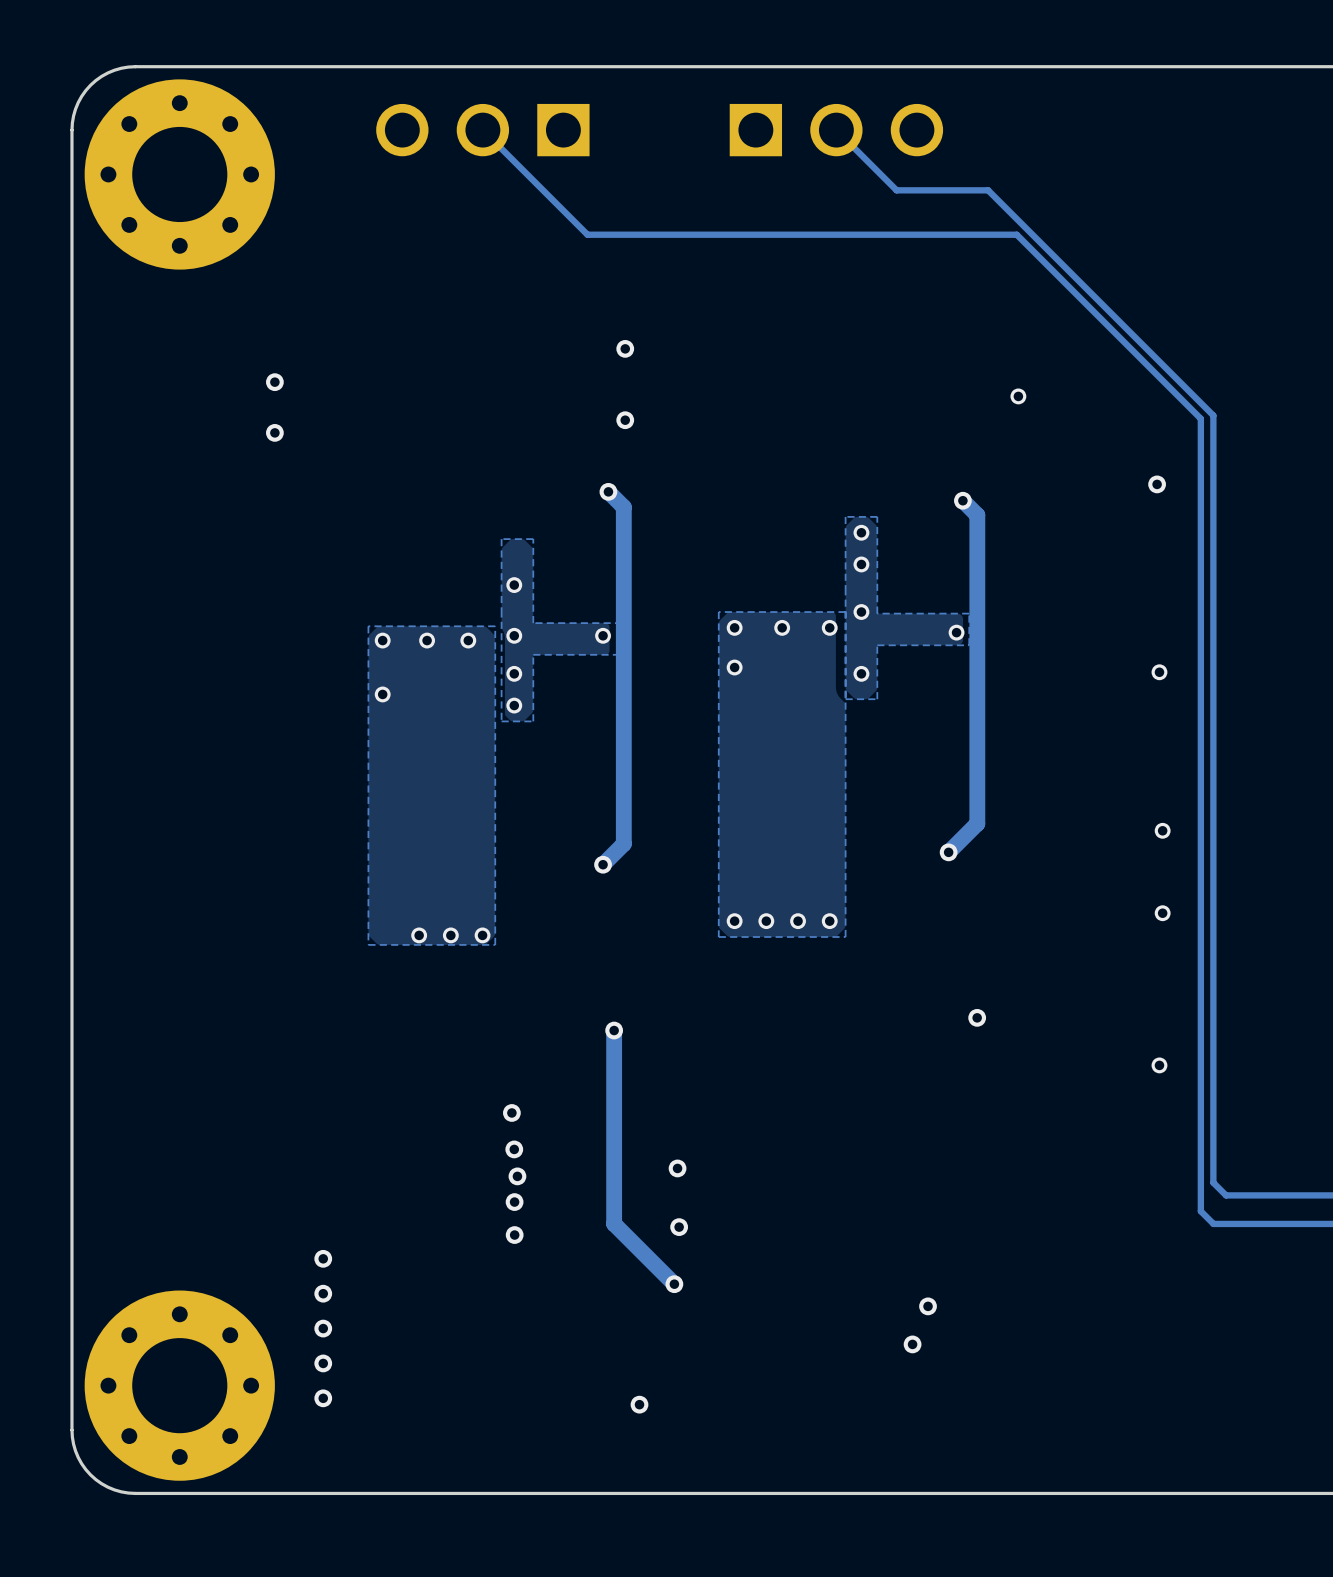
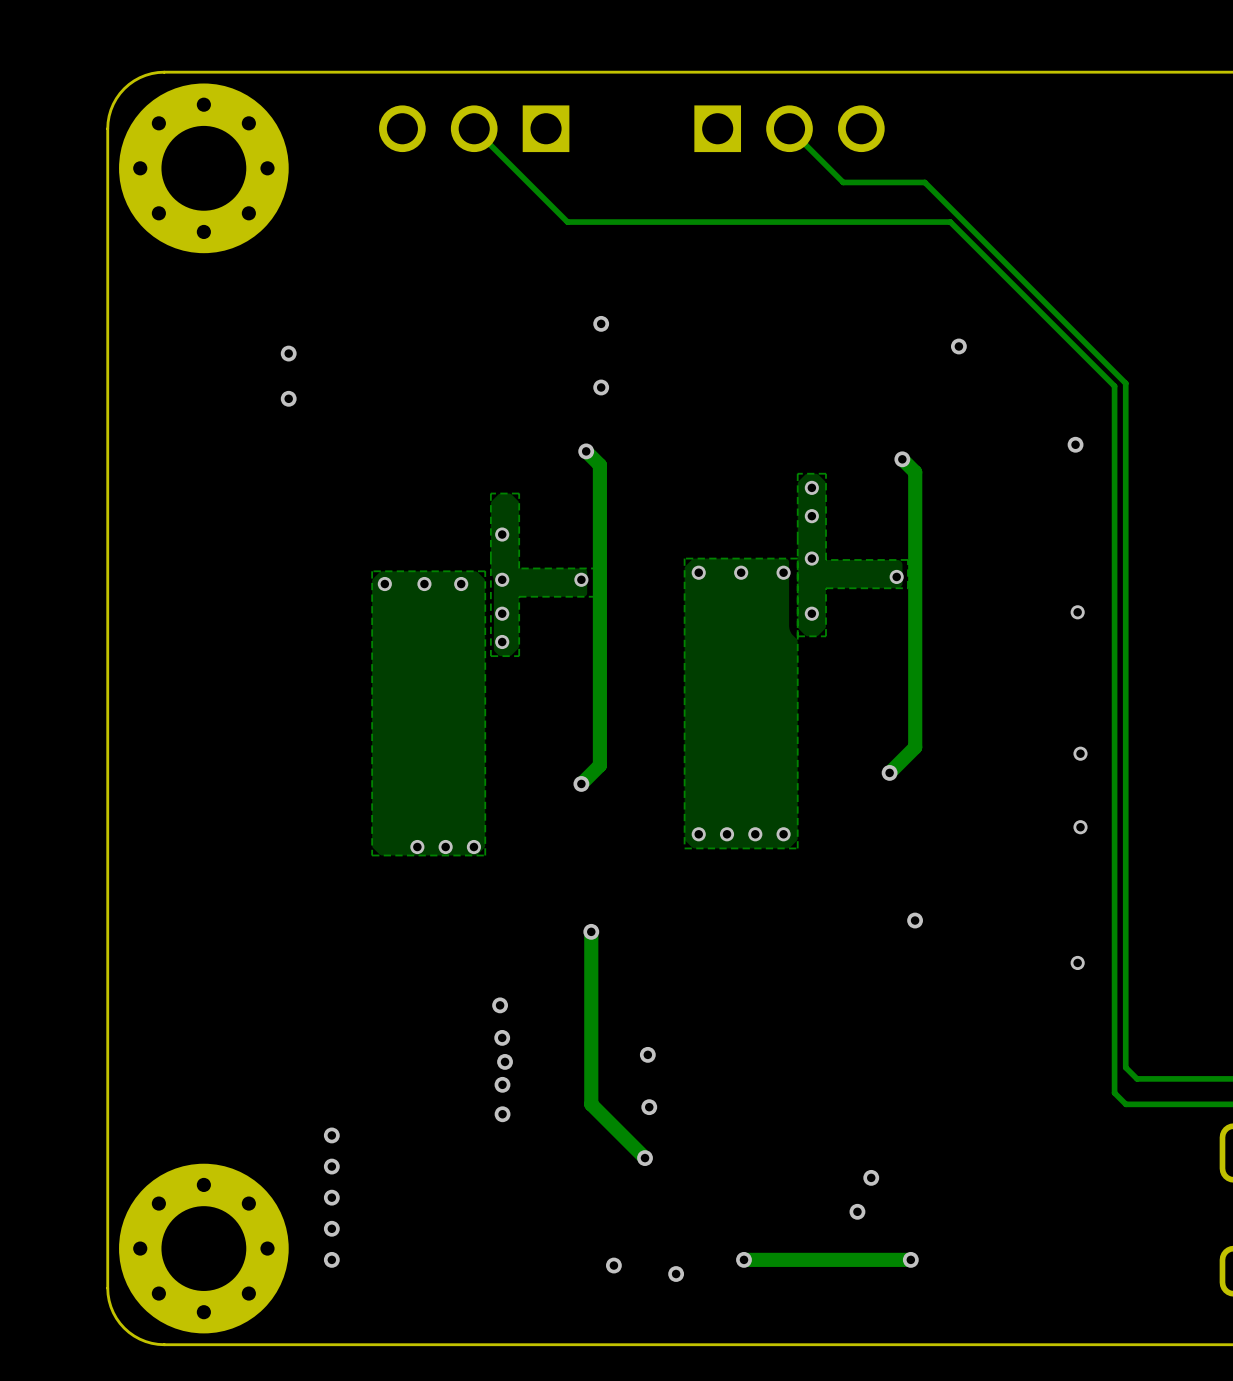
via: none -> (958, 346)
via: (1018, 396) -> none
via: (734, 667) -> none
via: (382, 694) -> none
via: none -> (743, 1259)
track: none -> (910, 1259) (743, 1259)
via: none -> (910, 1259)
via: none -> (676, 1274)

